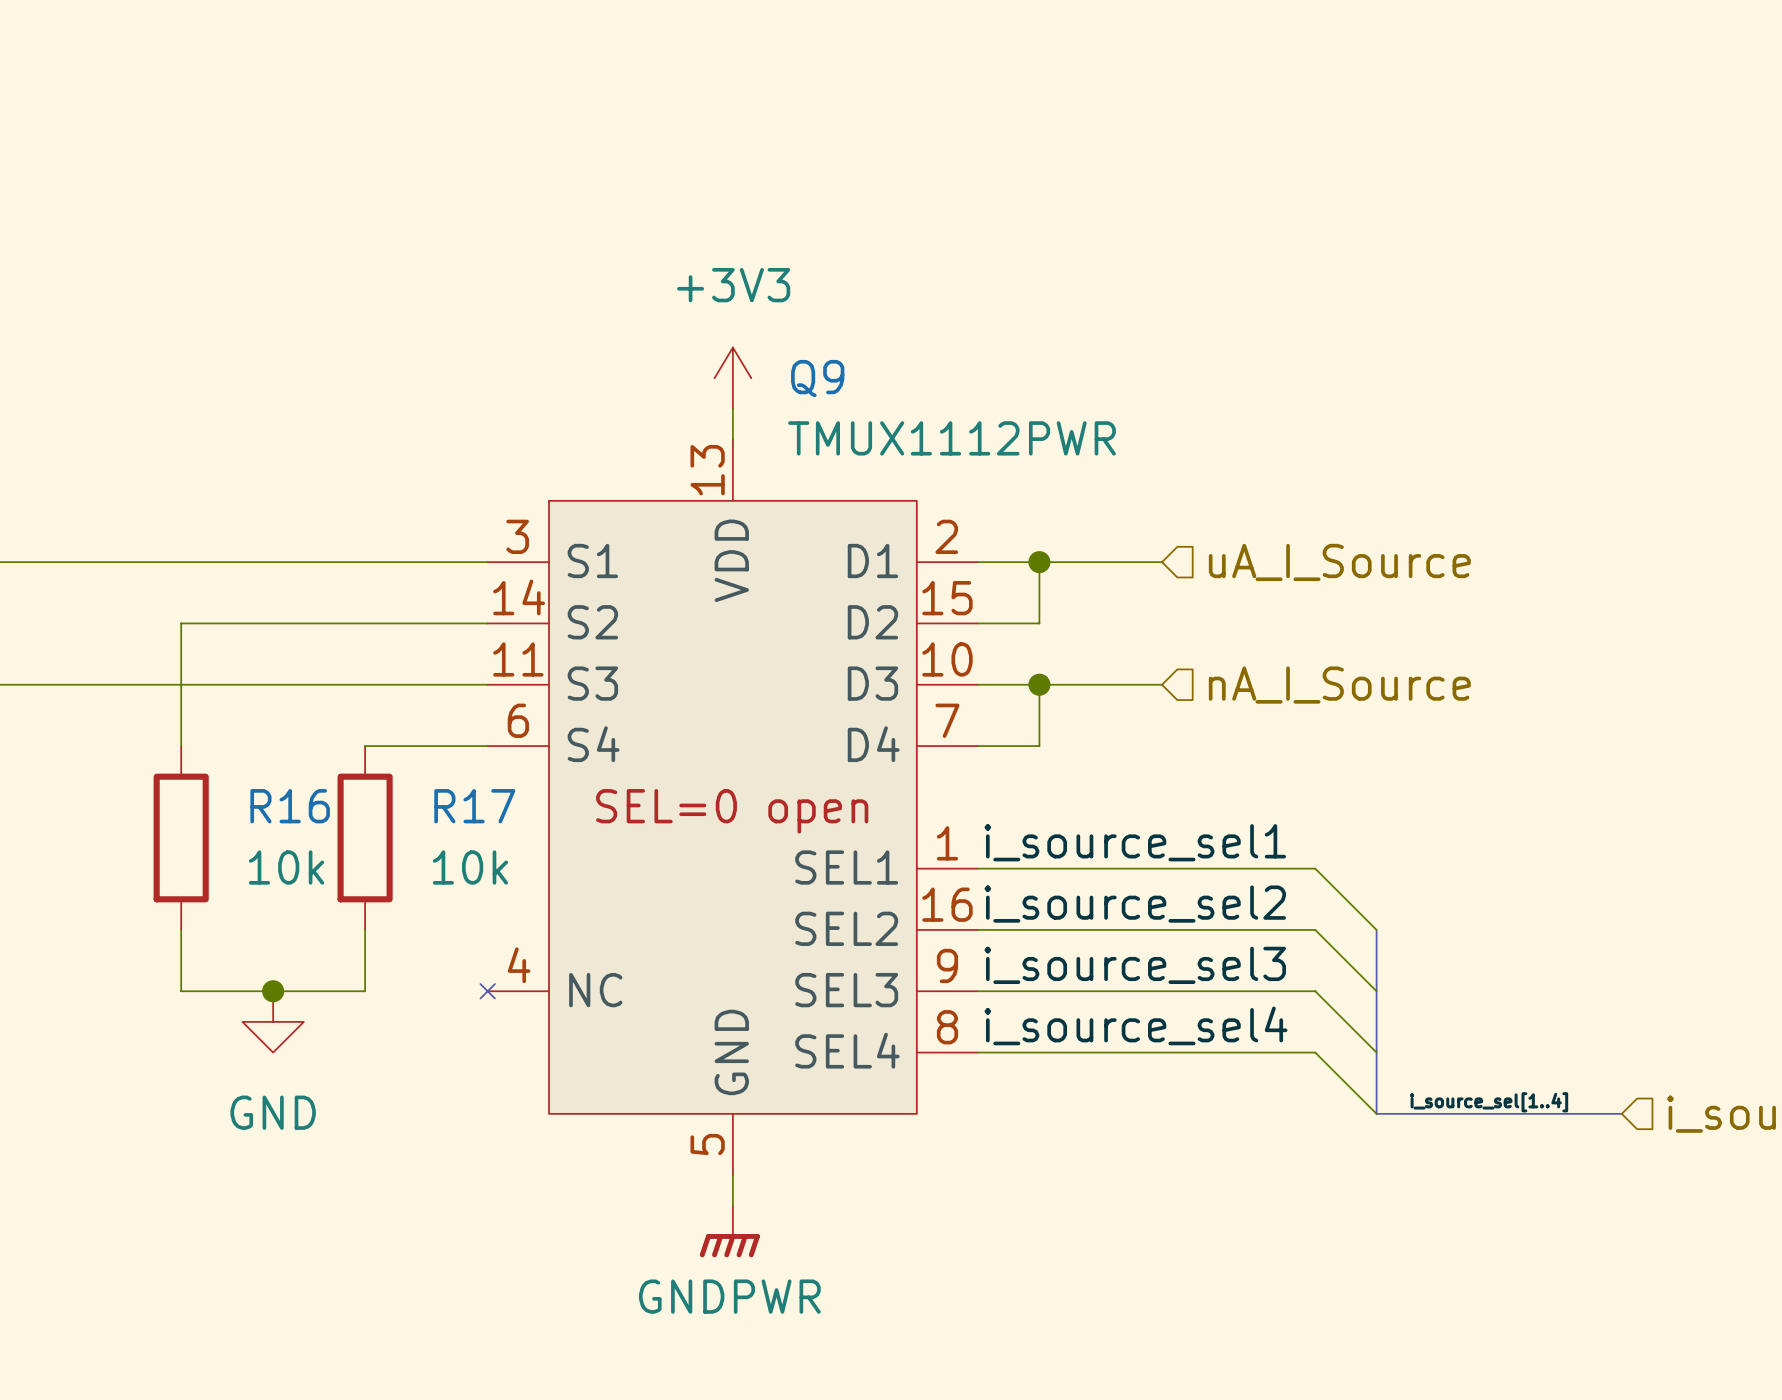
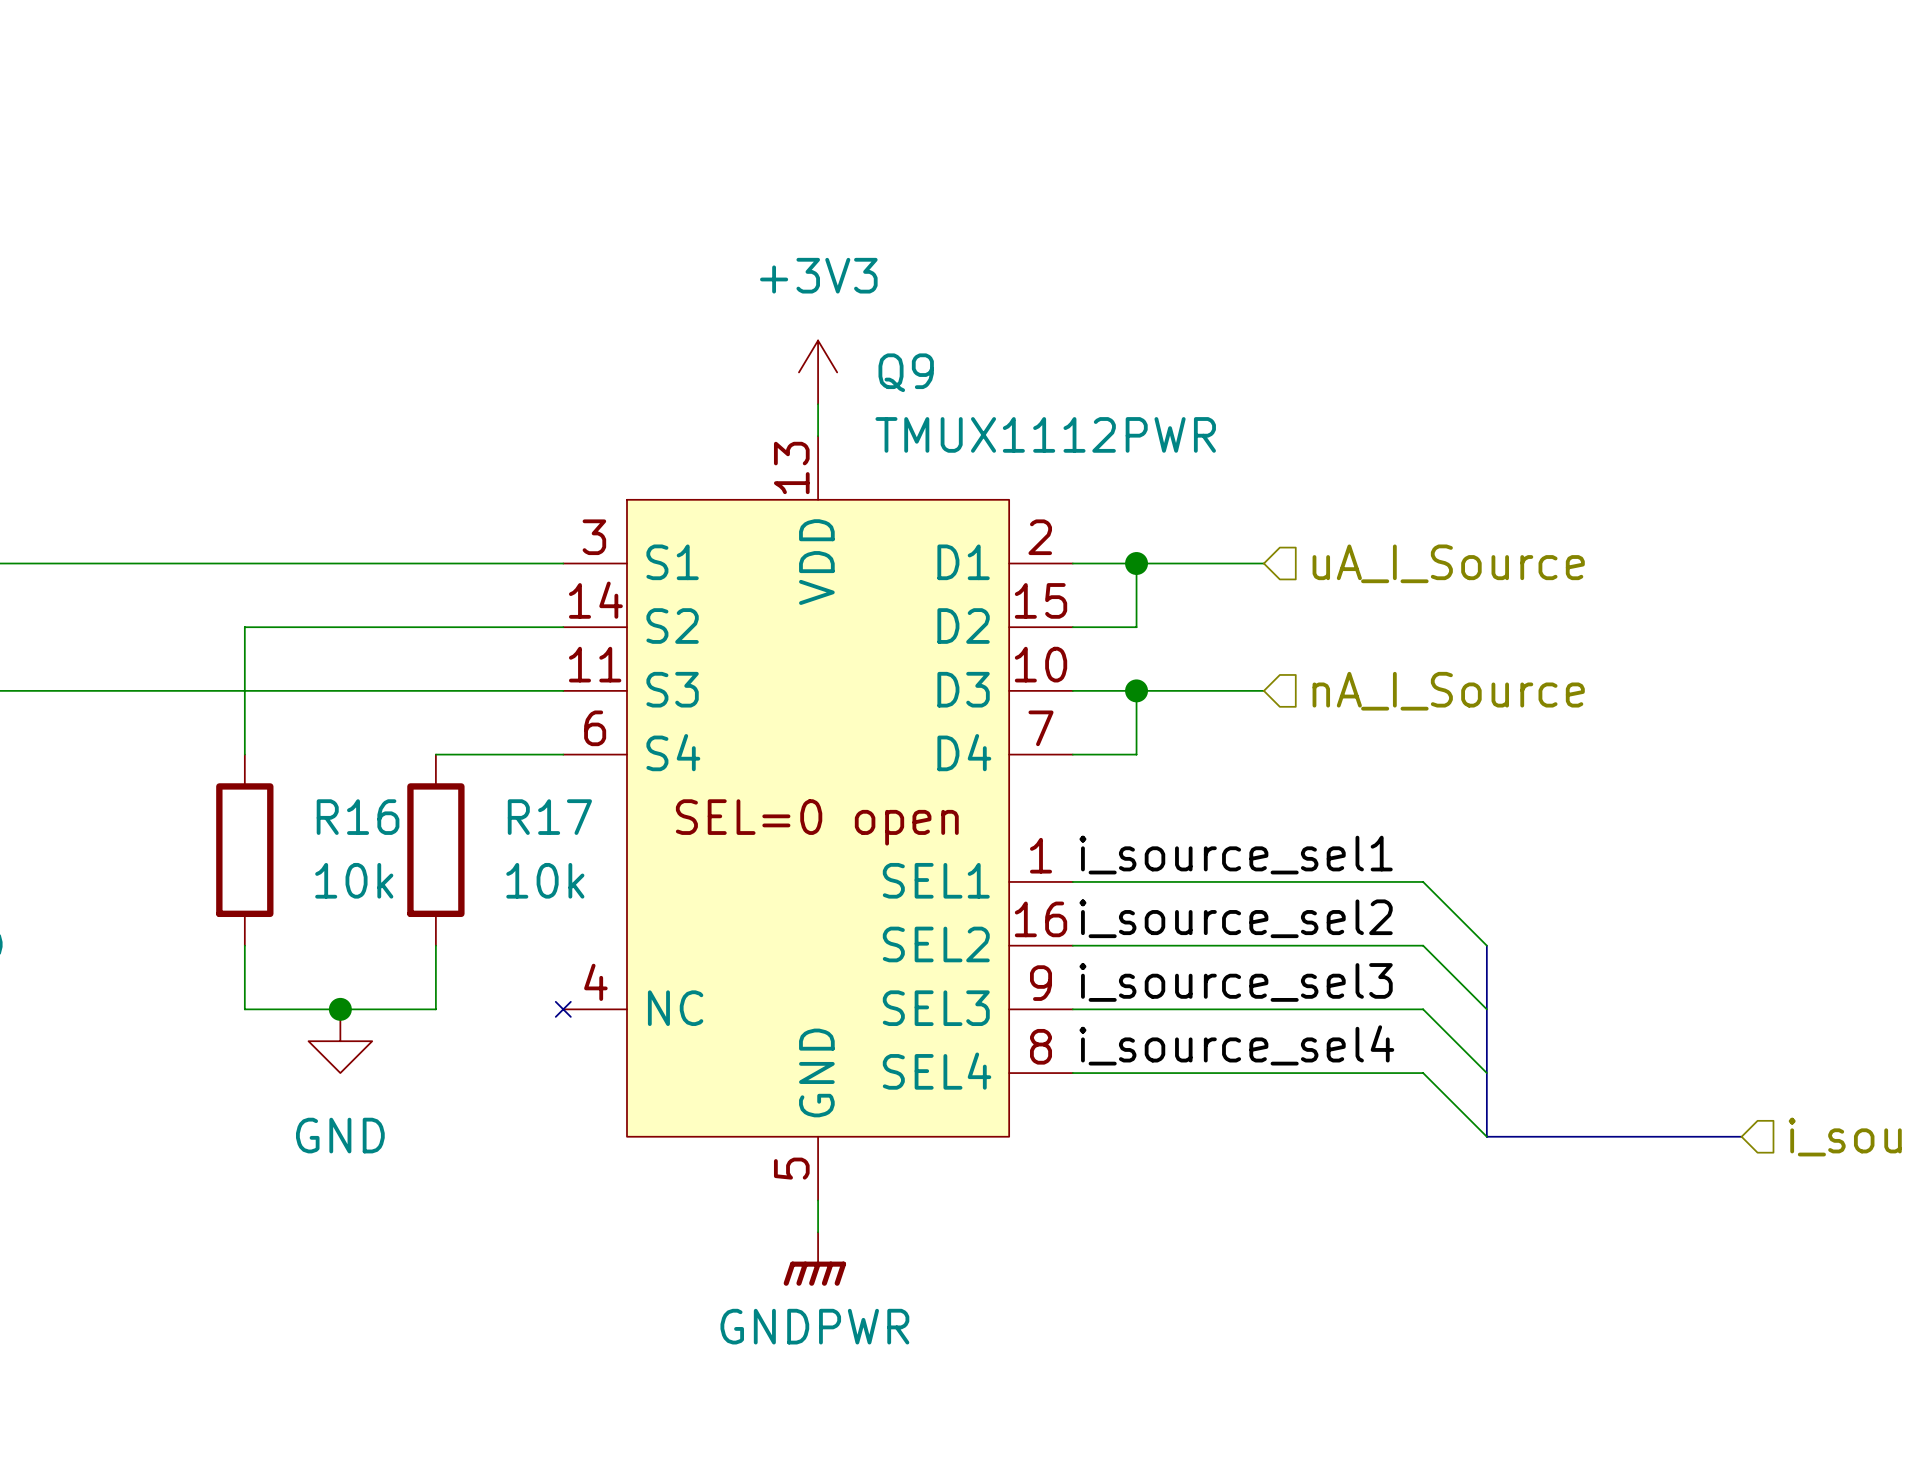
label: i_source_sel[1..4] (1489, 1102) -> none

